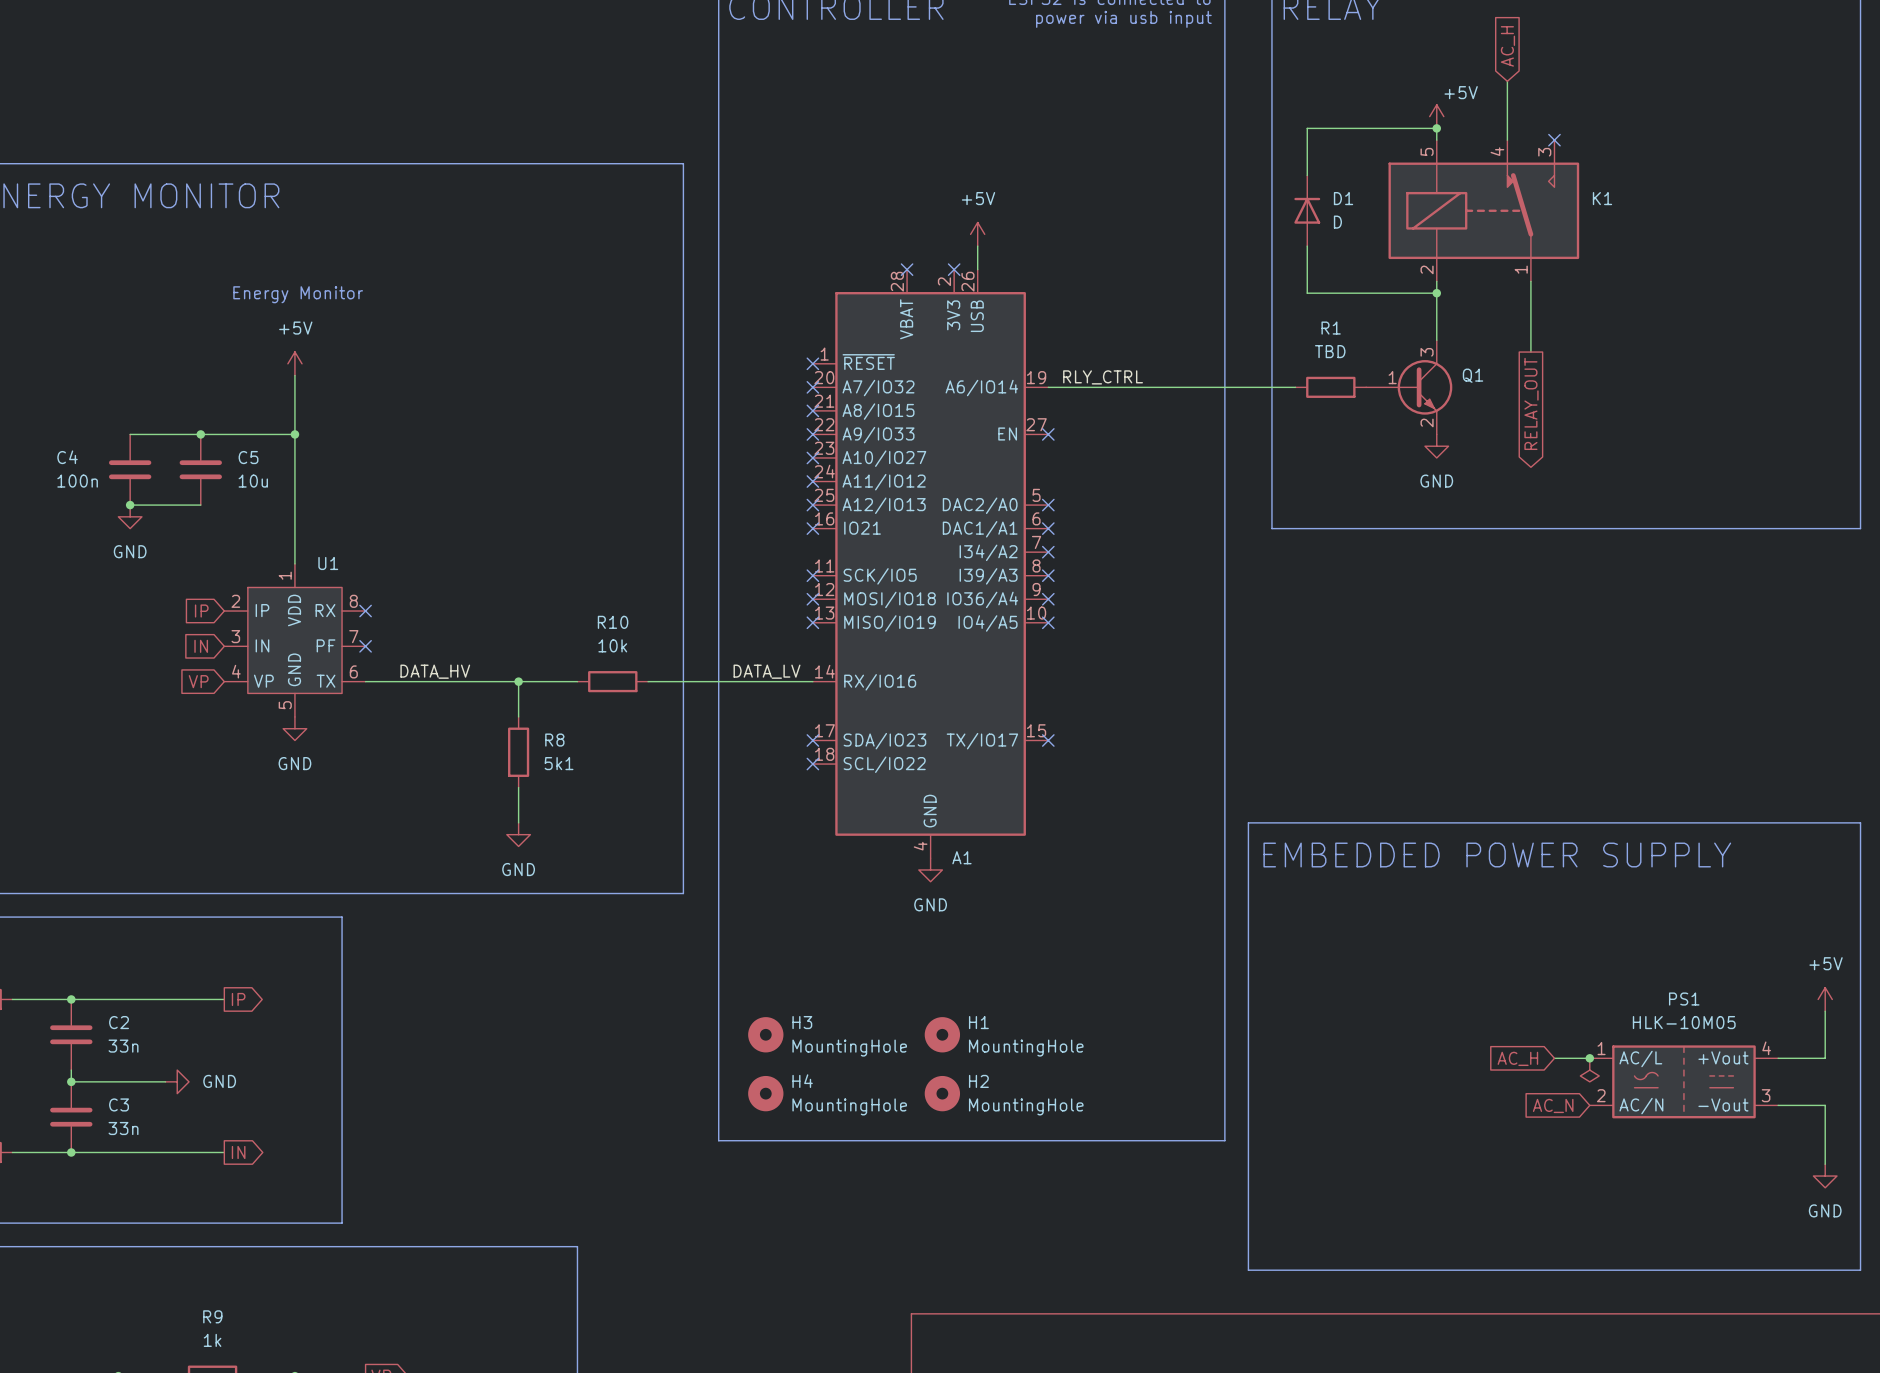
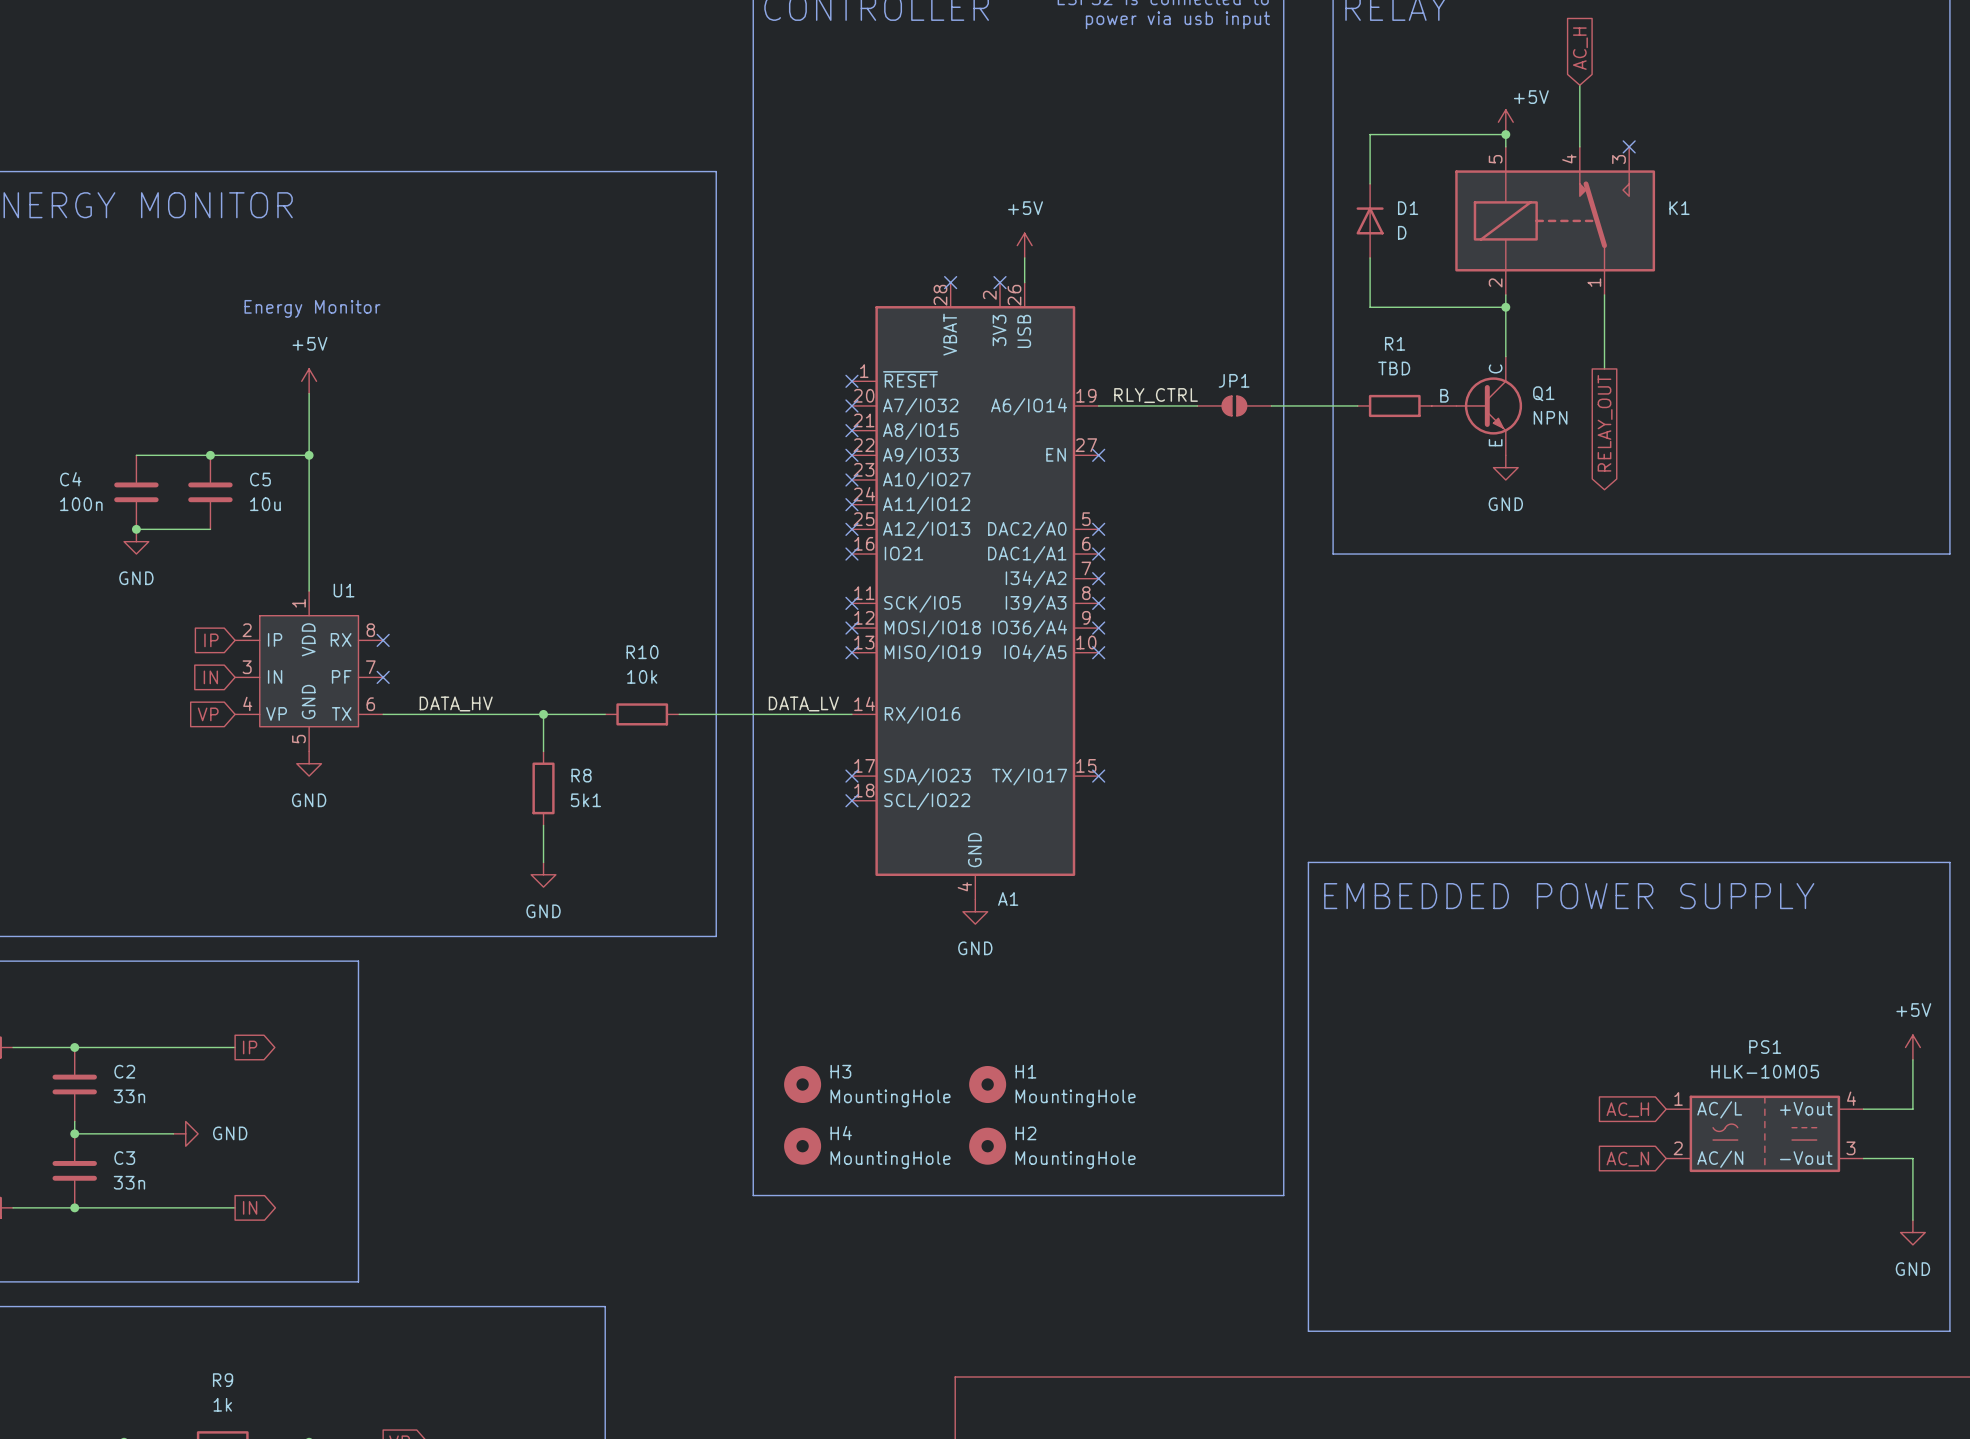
Q1 symbol: [1366, 340, 1453, 435] -> [1431, 356, 1523, 456]
JP1: none -> (1234, 405)
Q1 value: none -> NPN (1550, 417)
global label position: AC_H (1517, 1058) -> AC_H (1627, 1109)
wire: (1554, 1058) (1589, 1058) -> none
junction: (1589, 1058) -> none
power symbol: (1589, 1070) -> none

